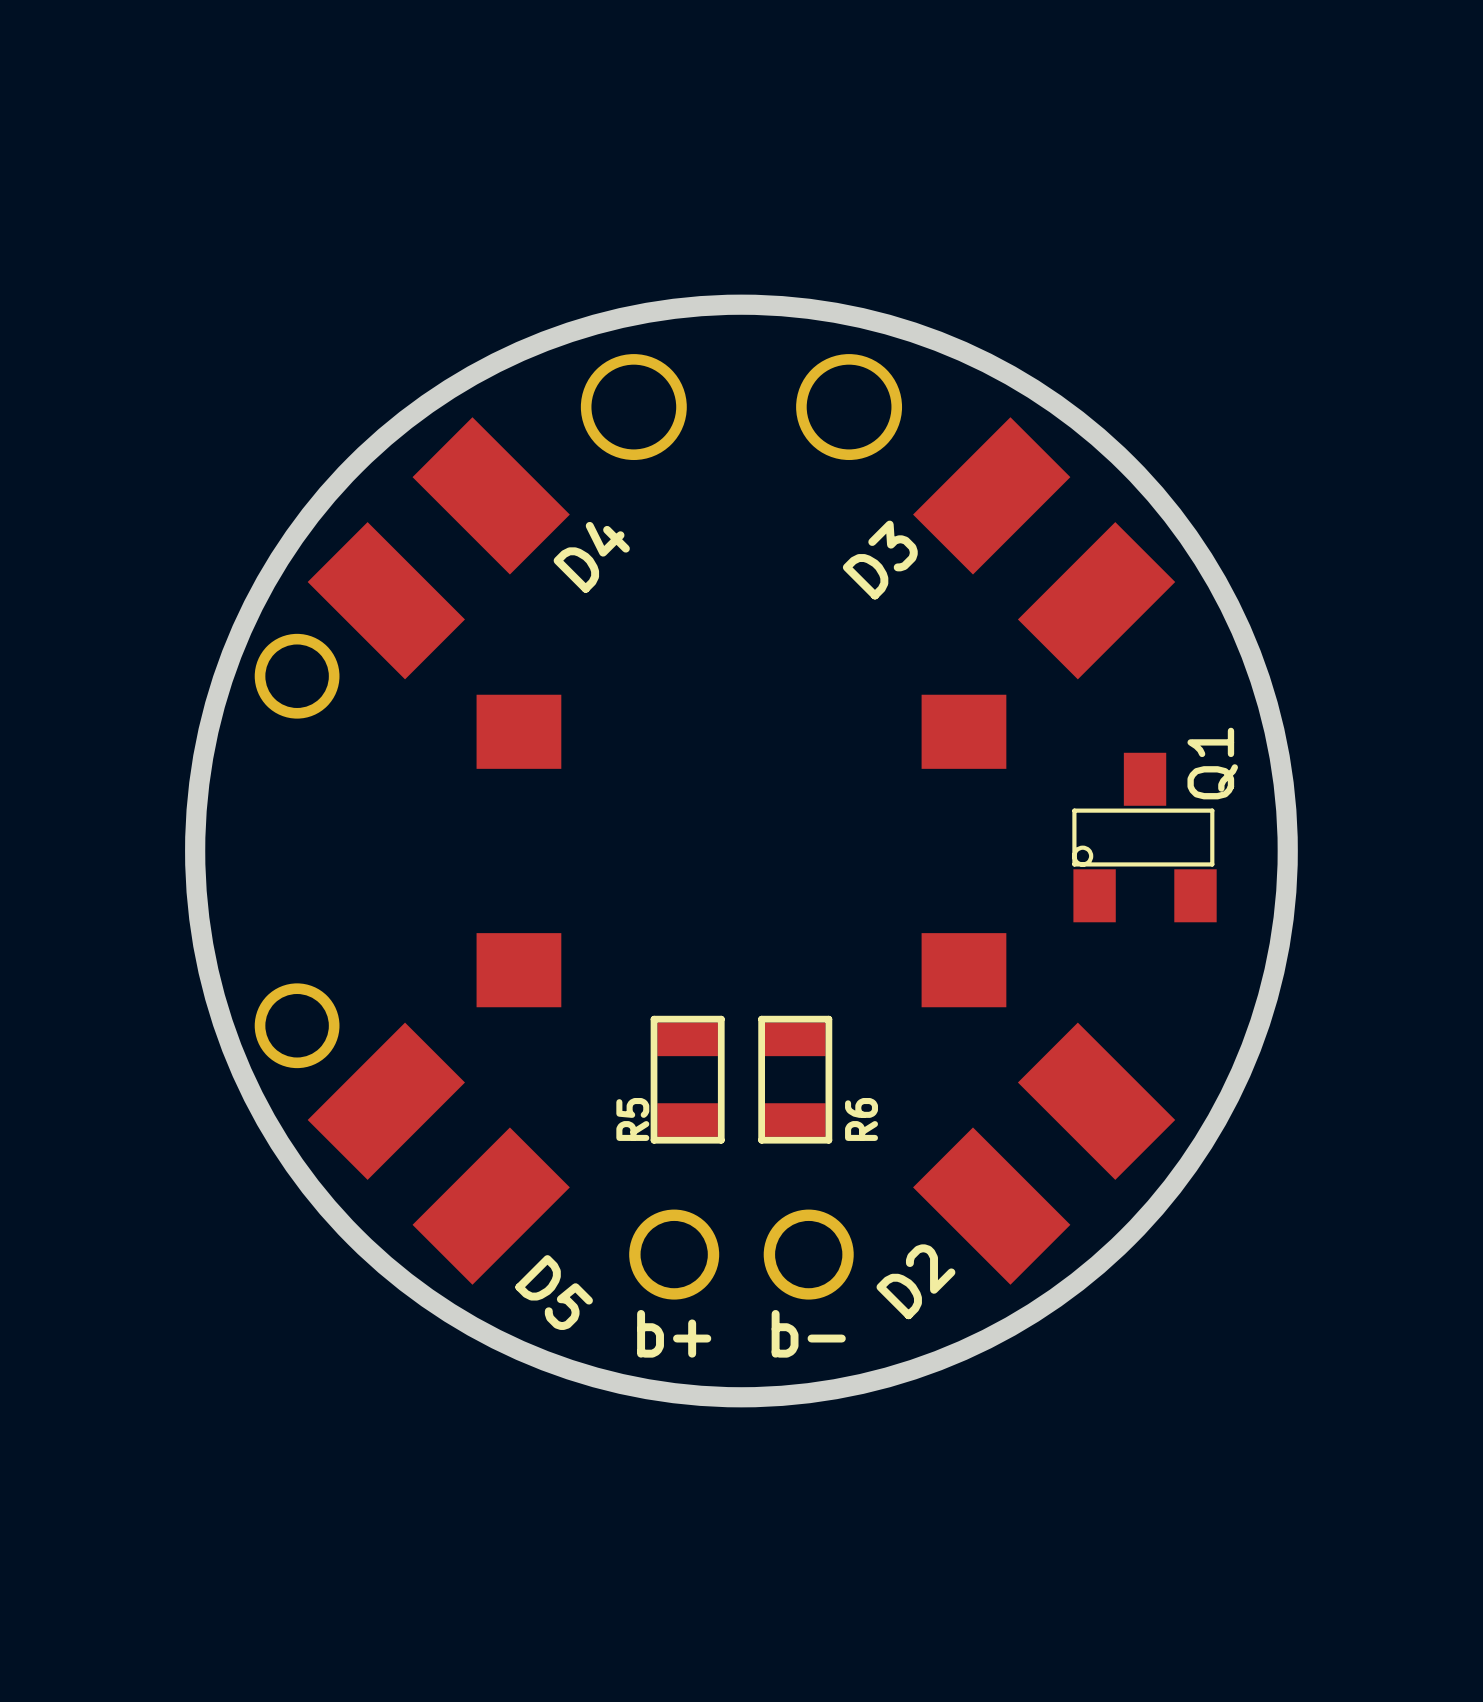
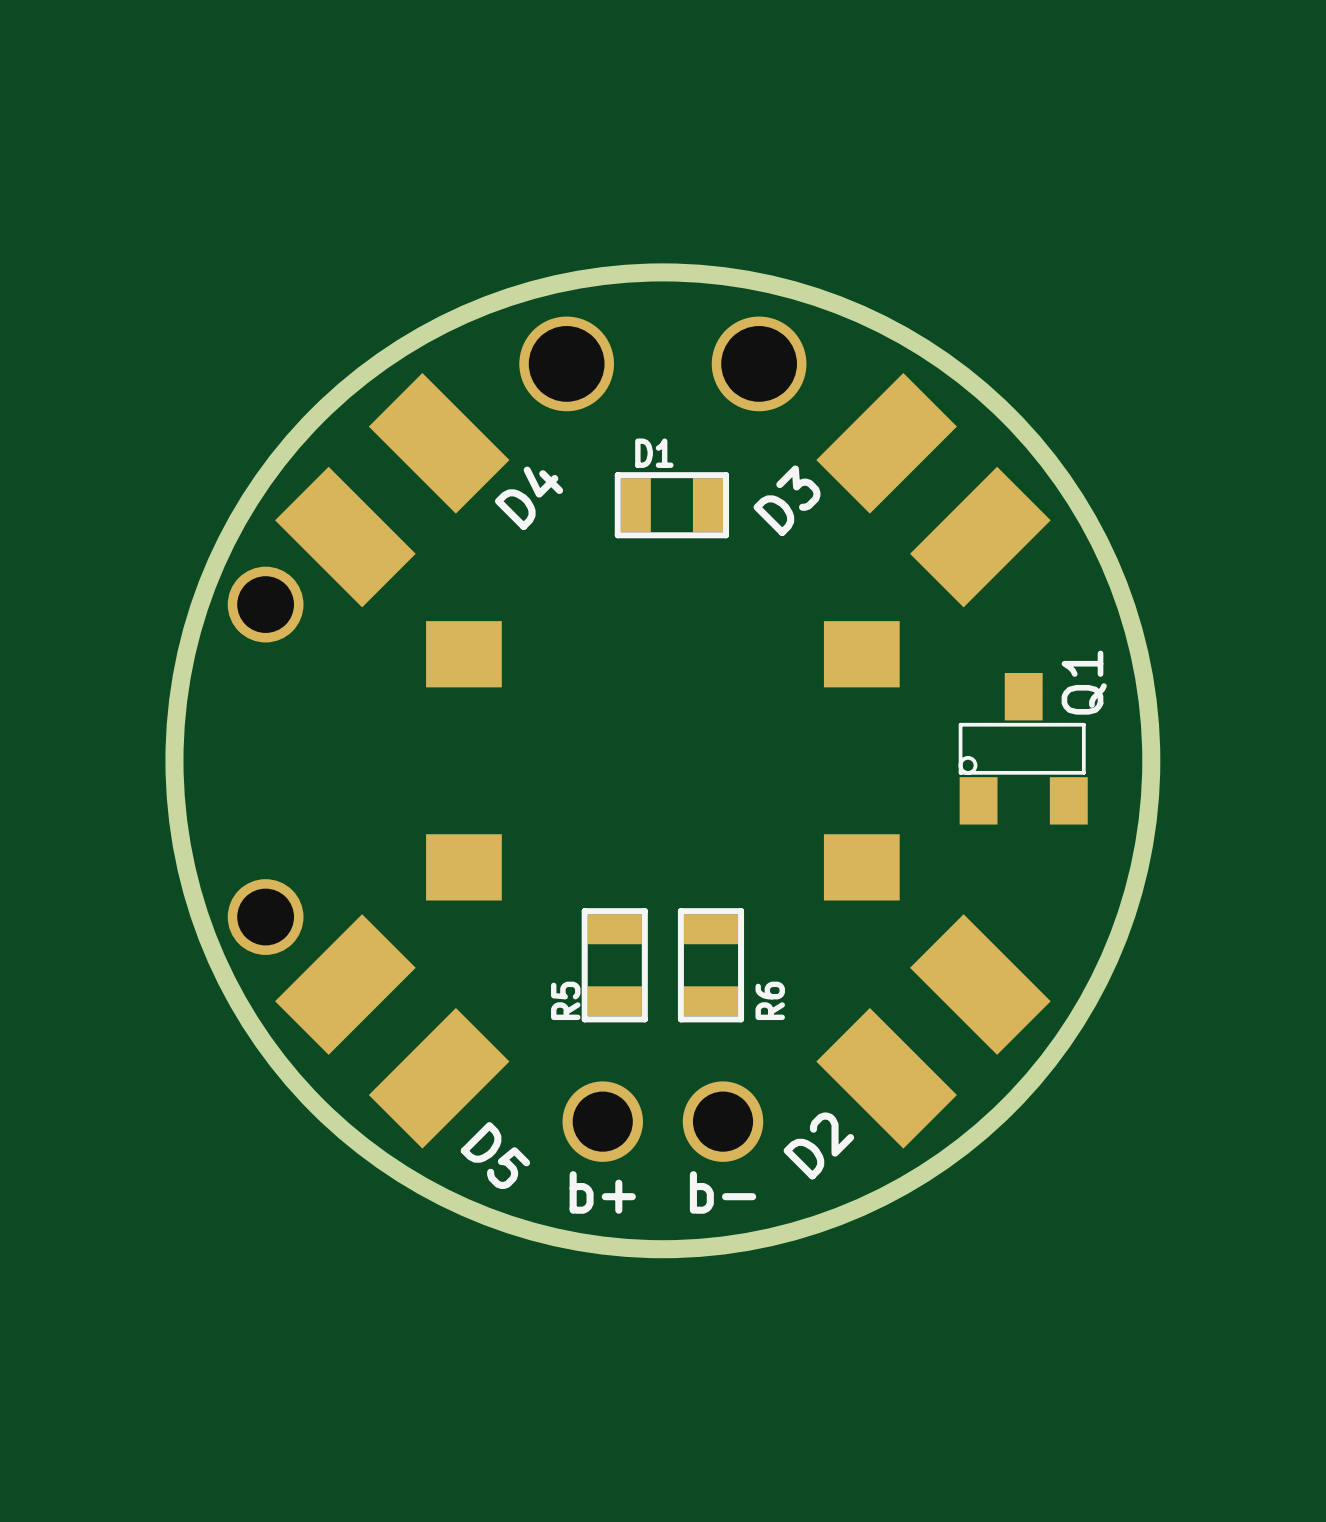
D1: none -> (671, 505)

